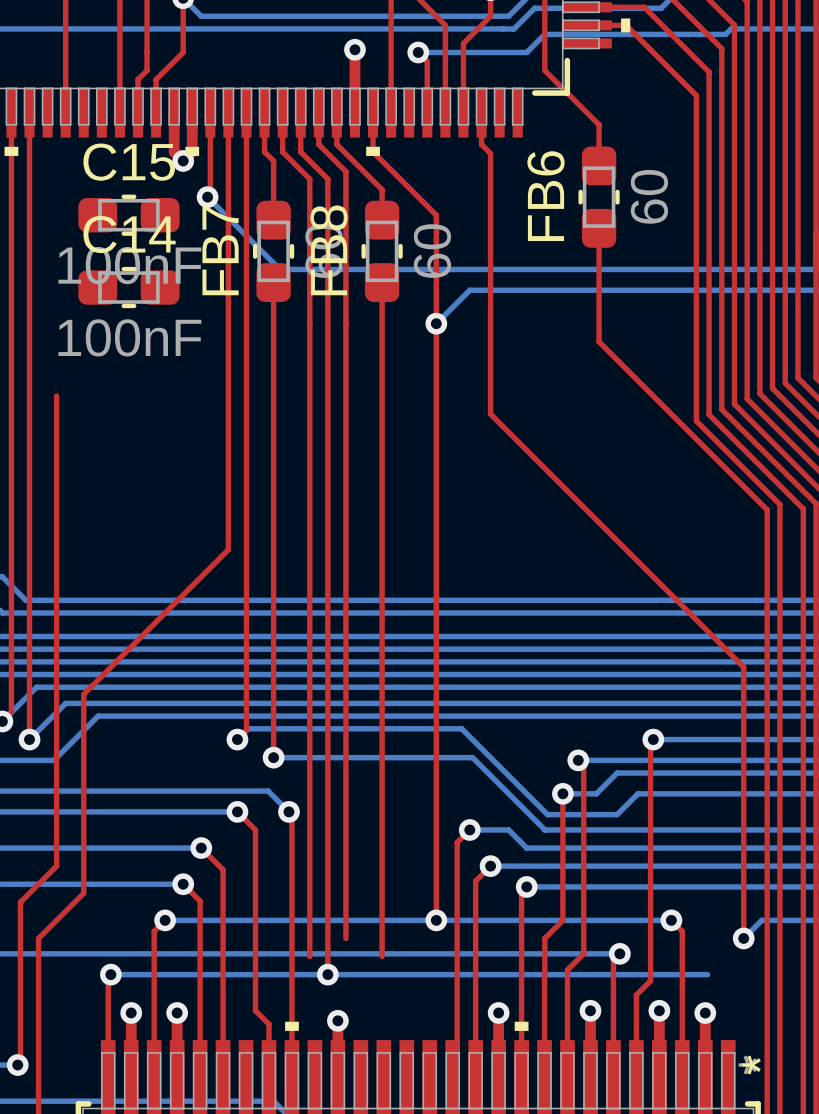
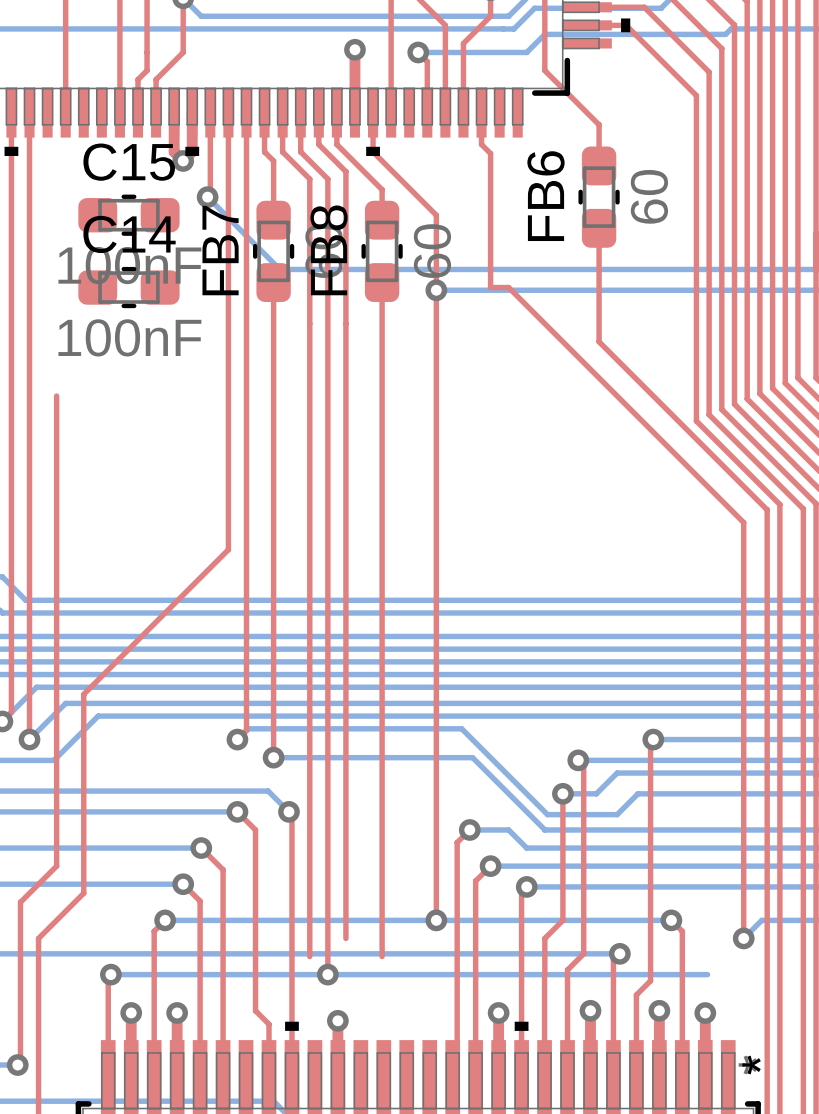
top track: (490, 287) (490, 414) (743, 667) -> (490, 287) (508, 287) (743, 522) (743, 667)
bottom track: (469, 290) (436, 323) -> (469, 290) (436, 290)
via position: (436, 323) -> (436, 290)

